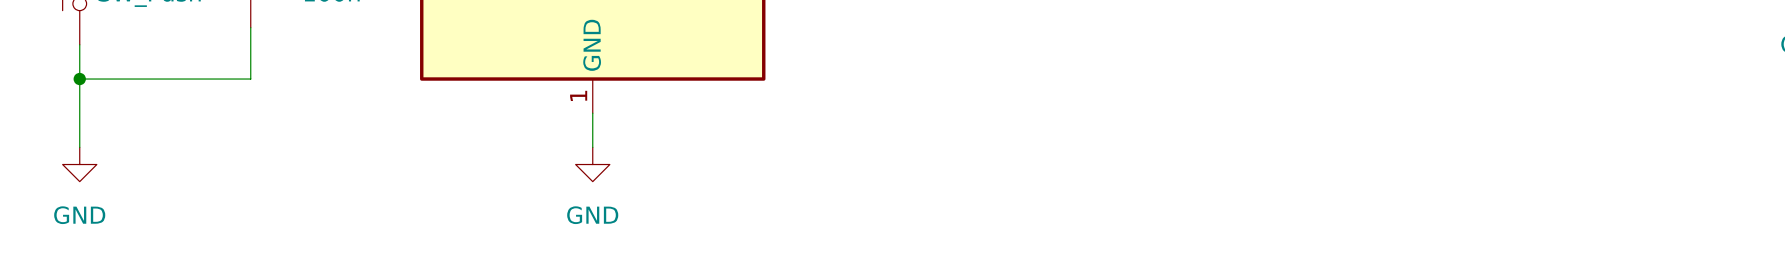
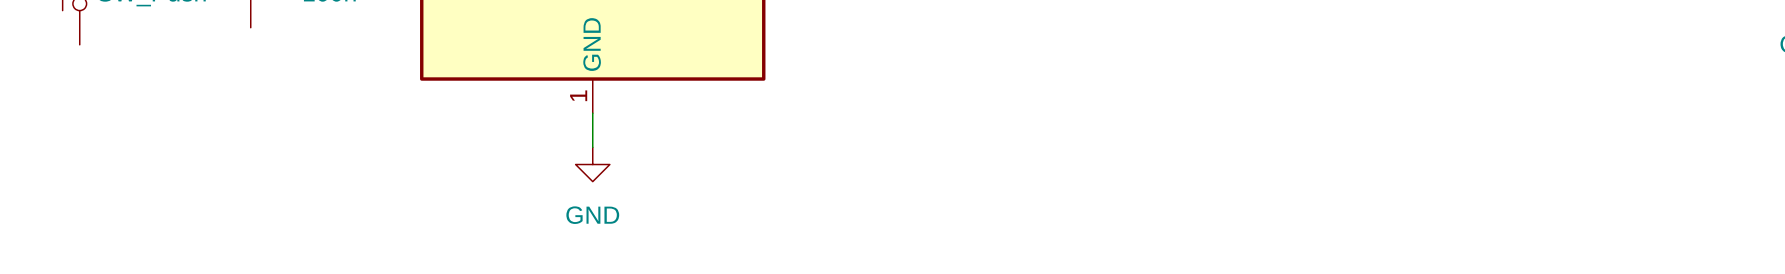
wire: (250, 27) (250, 79) (79, 79) -> none
wire: (79, 44) (79, 147) -> none
junction: (79, 79) -> none
power symbol: GND (79, 164) -> none

